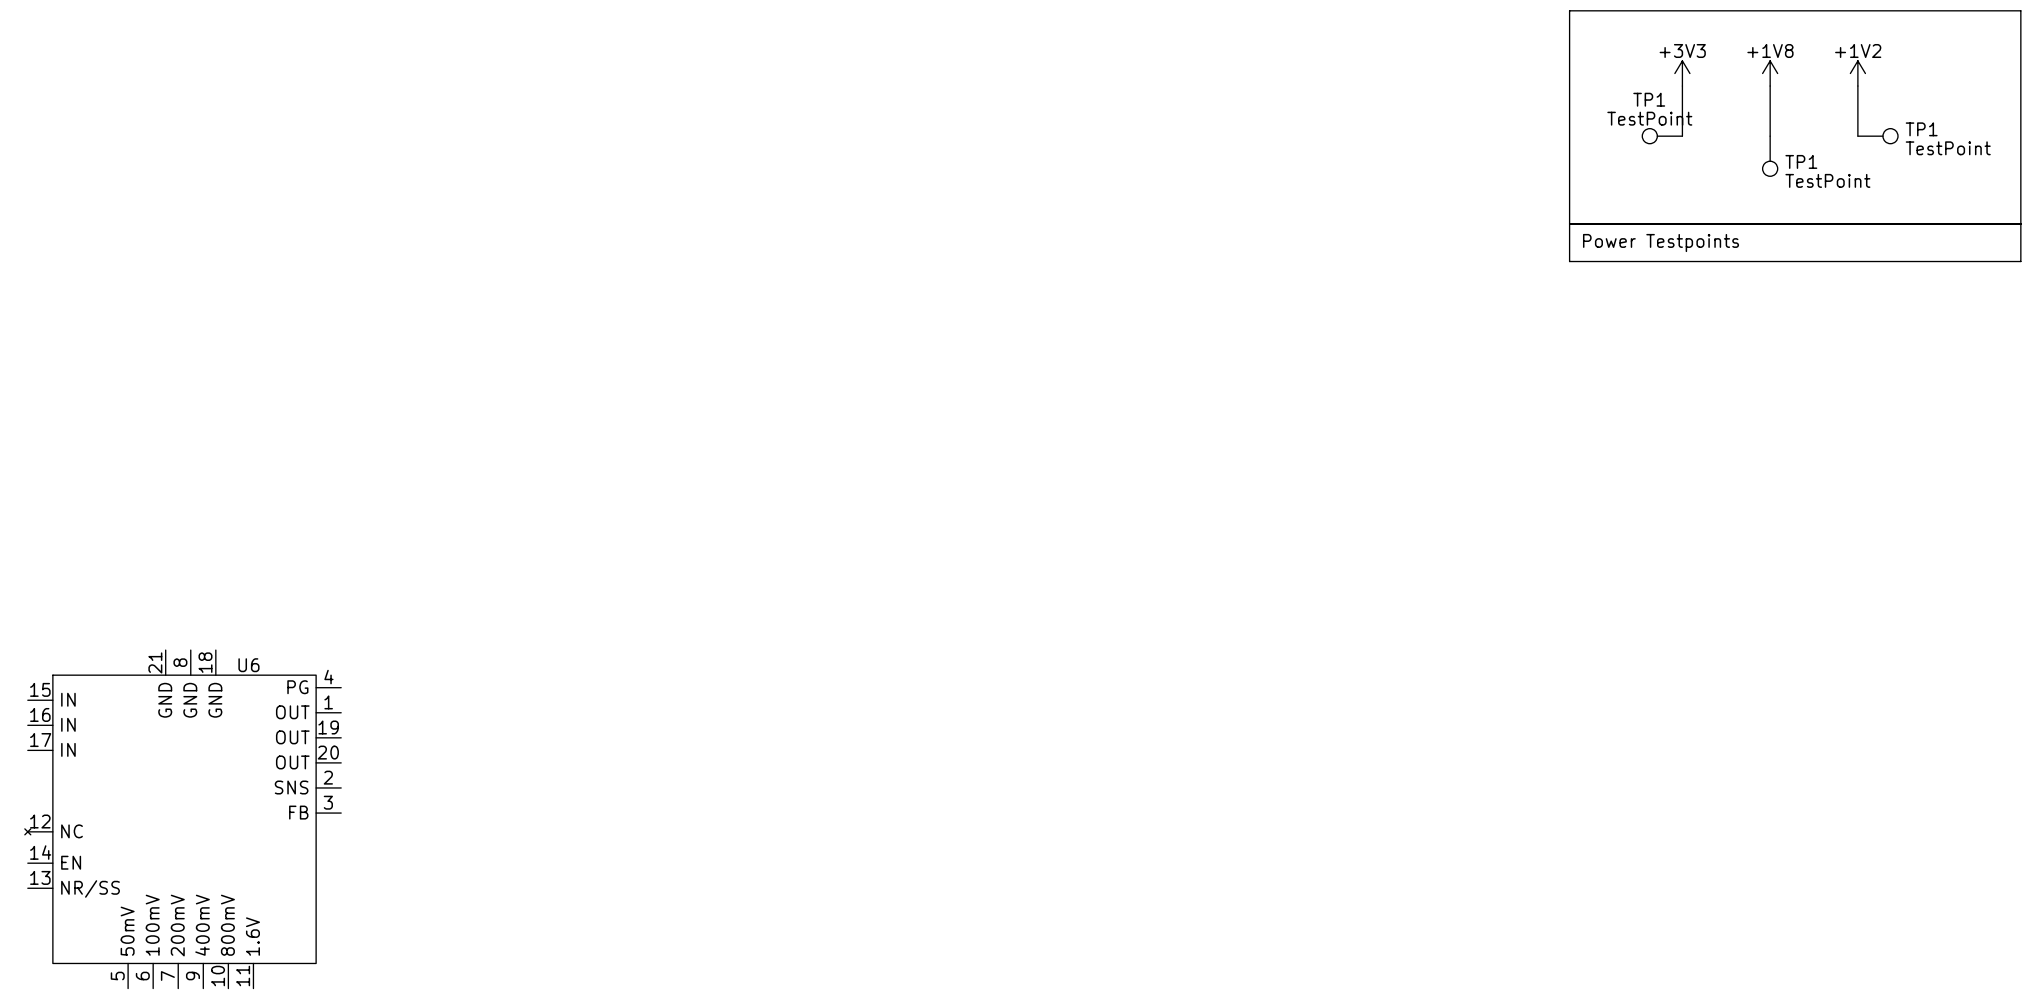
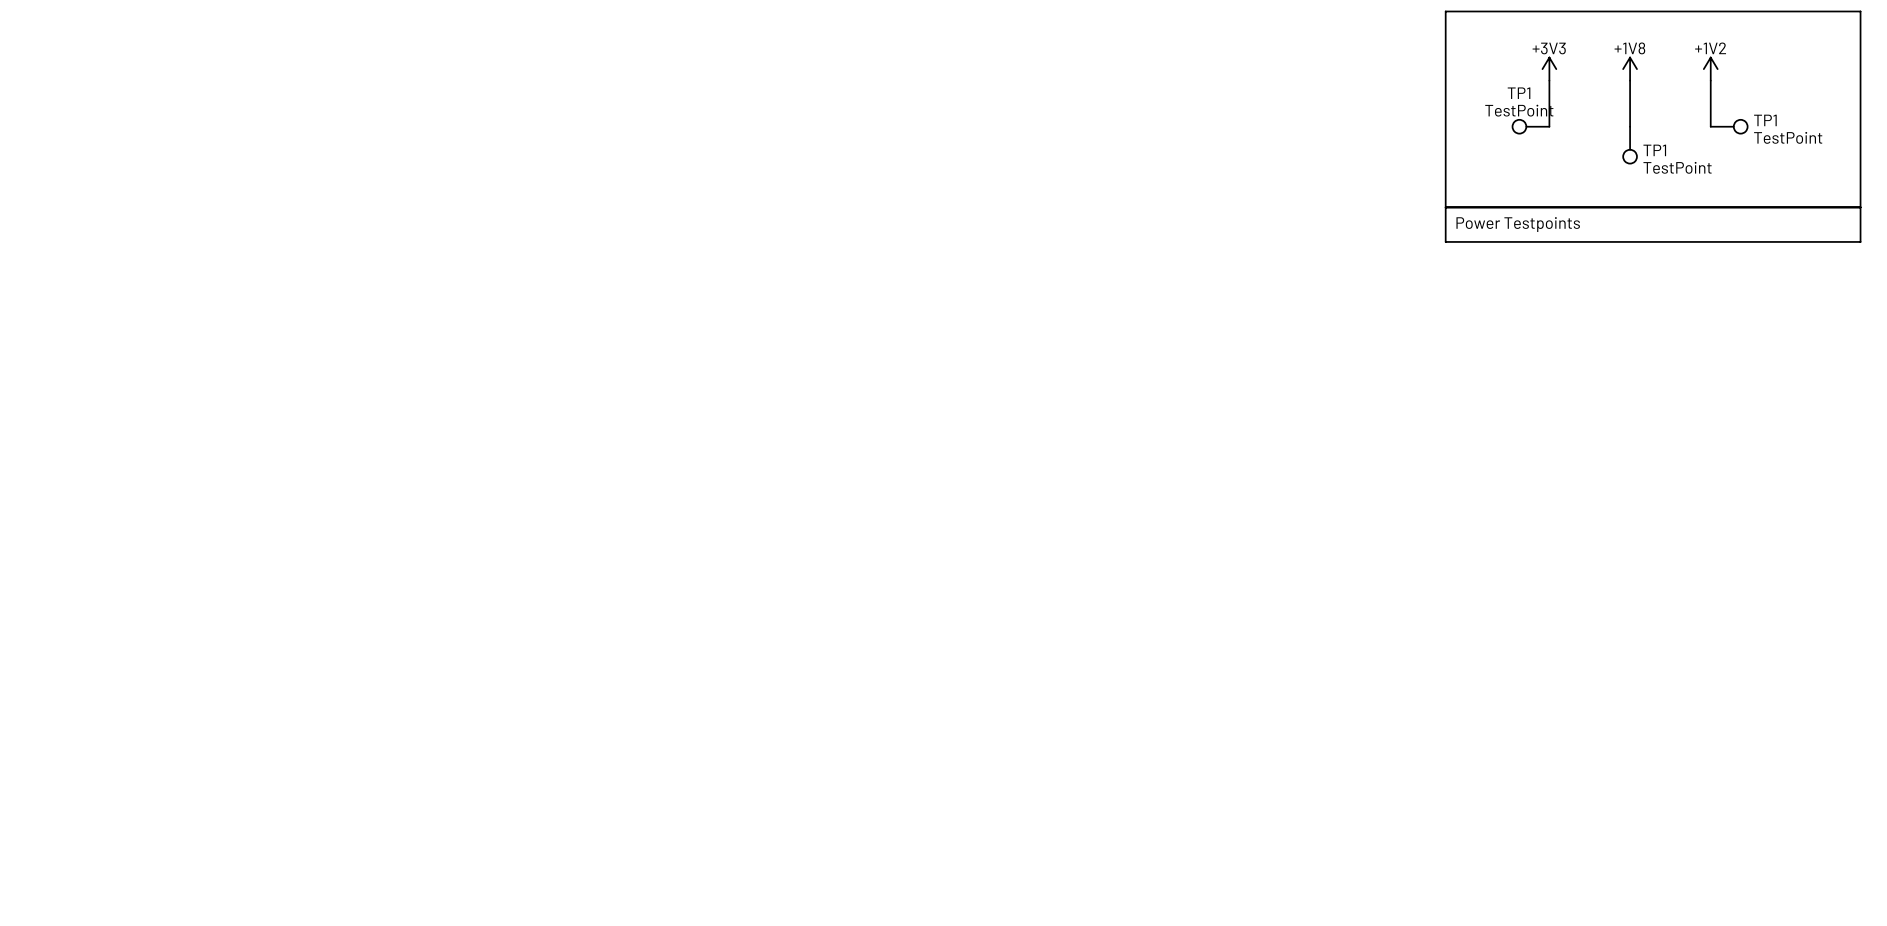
U6: (183, 819) -> none

